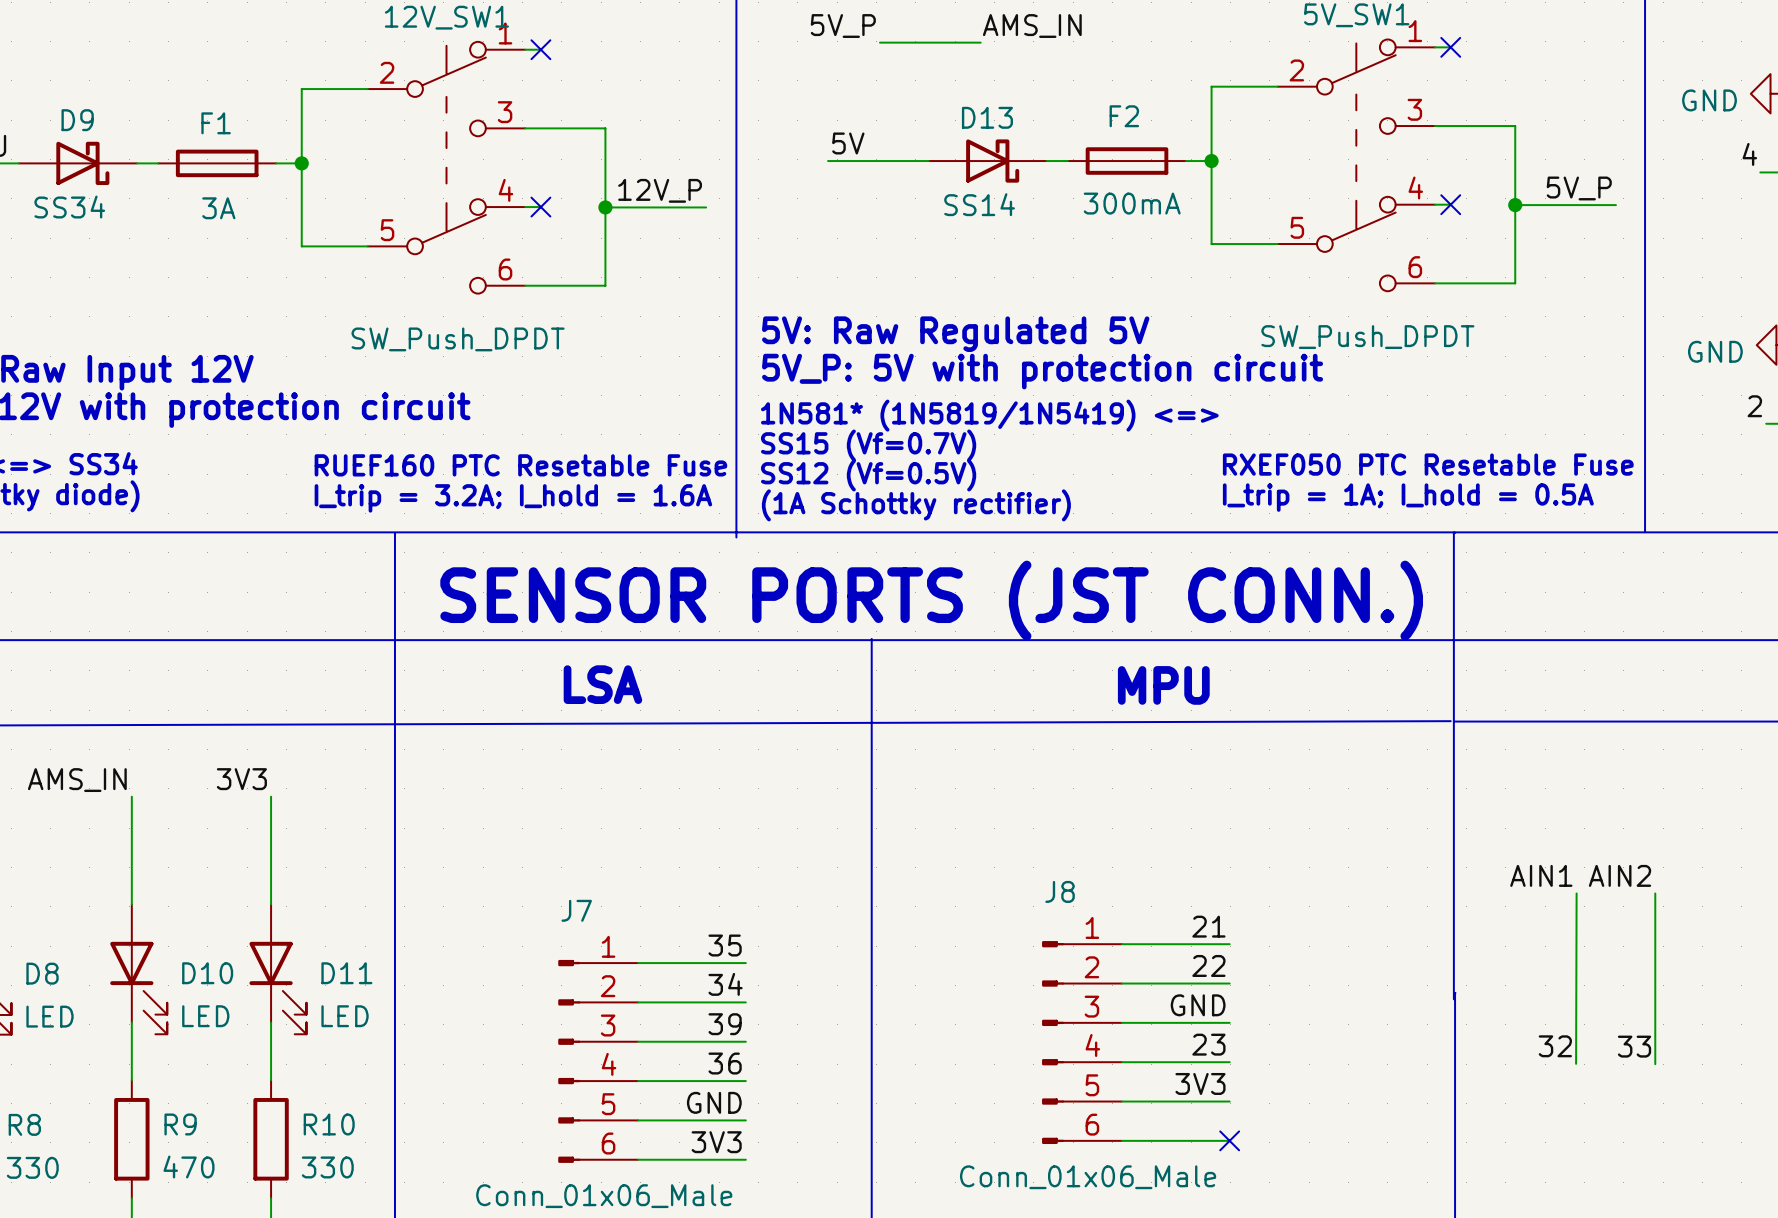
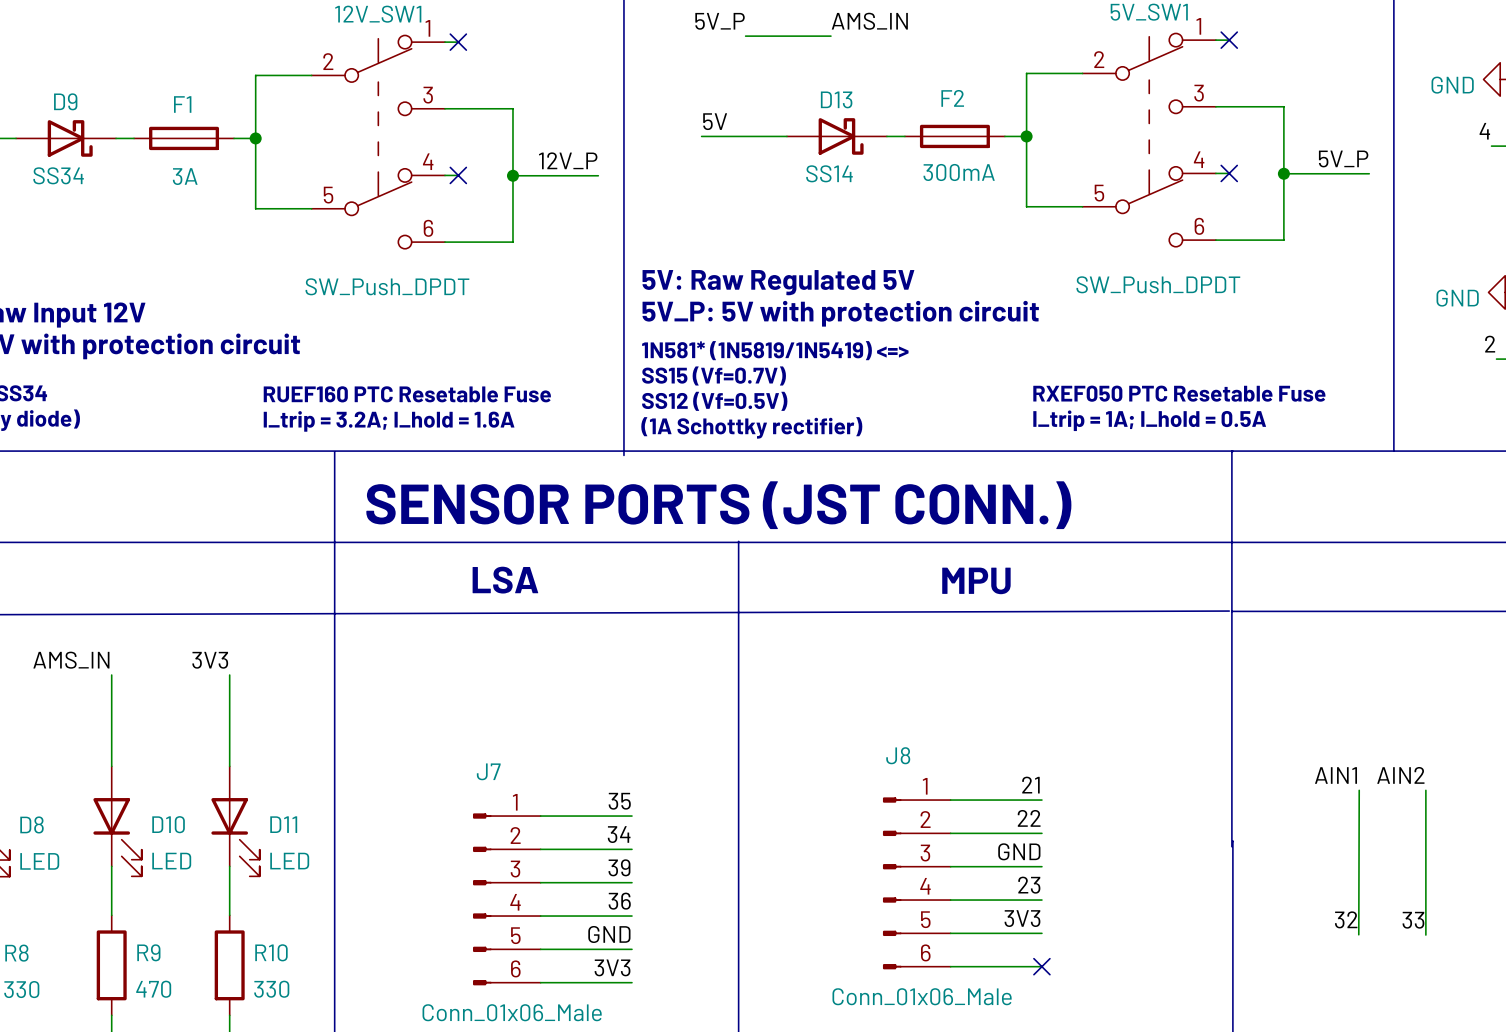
label position: AIN1 (1541, 875) -> AIN1 (1335, 775)
label position: AIN2 (1620, 875) -> AIN2 (1400, 775)
wire: (1576, 893) (1576, 1063) -> (1359, 790) (1358, 934)
wire: (1655, 893) (1655, 1064) -> (1425, 790) (1425, 935)
label position: 32 (1555, 1046) -> 32 (1346, 919)
label position: 33 (1634, 1046) -> 33 (1413, 920)

